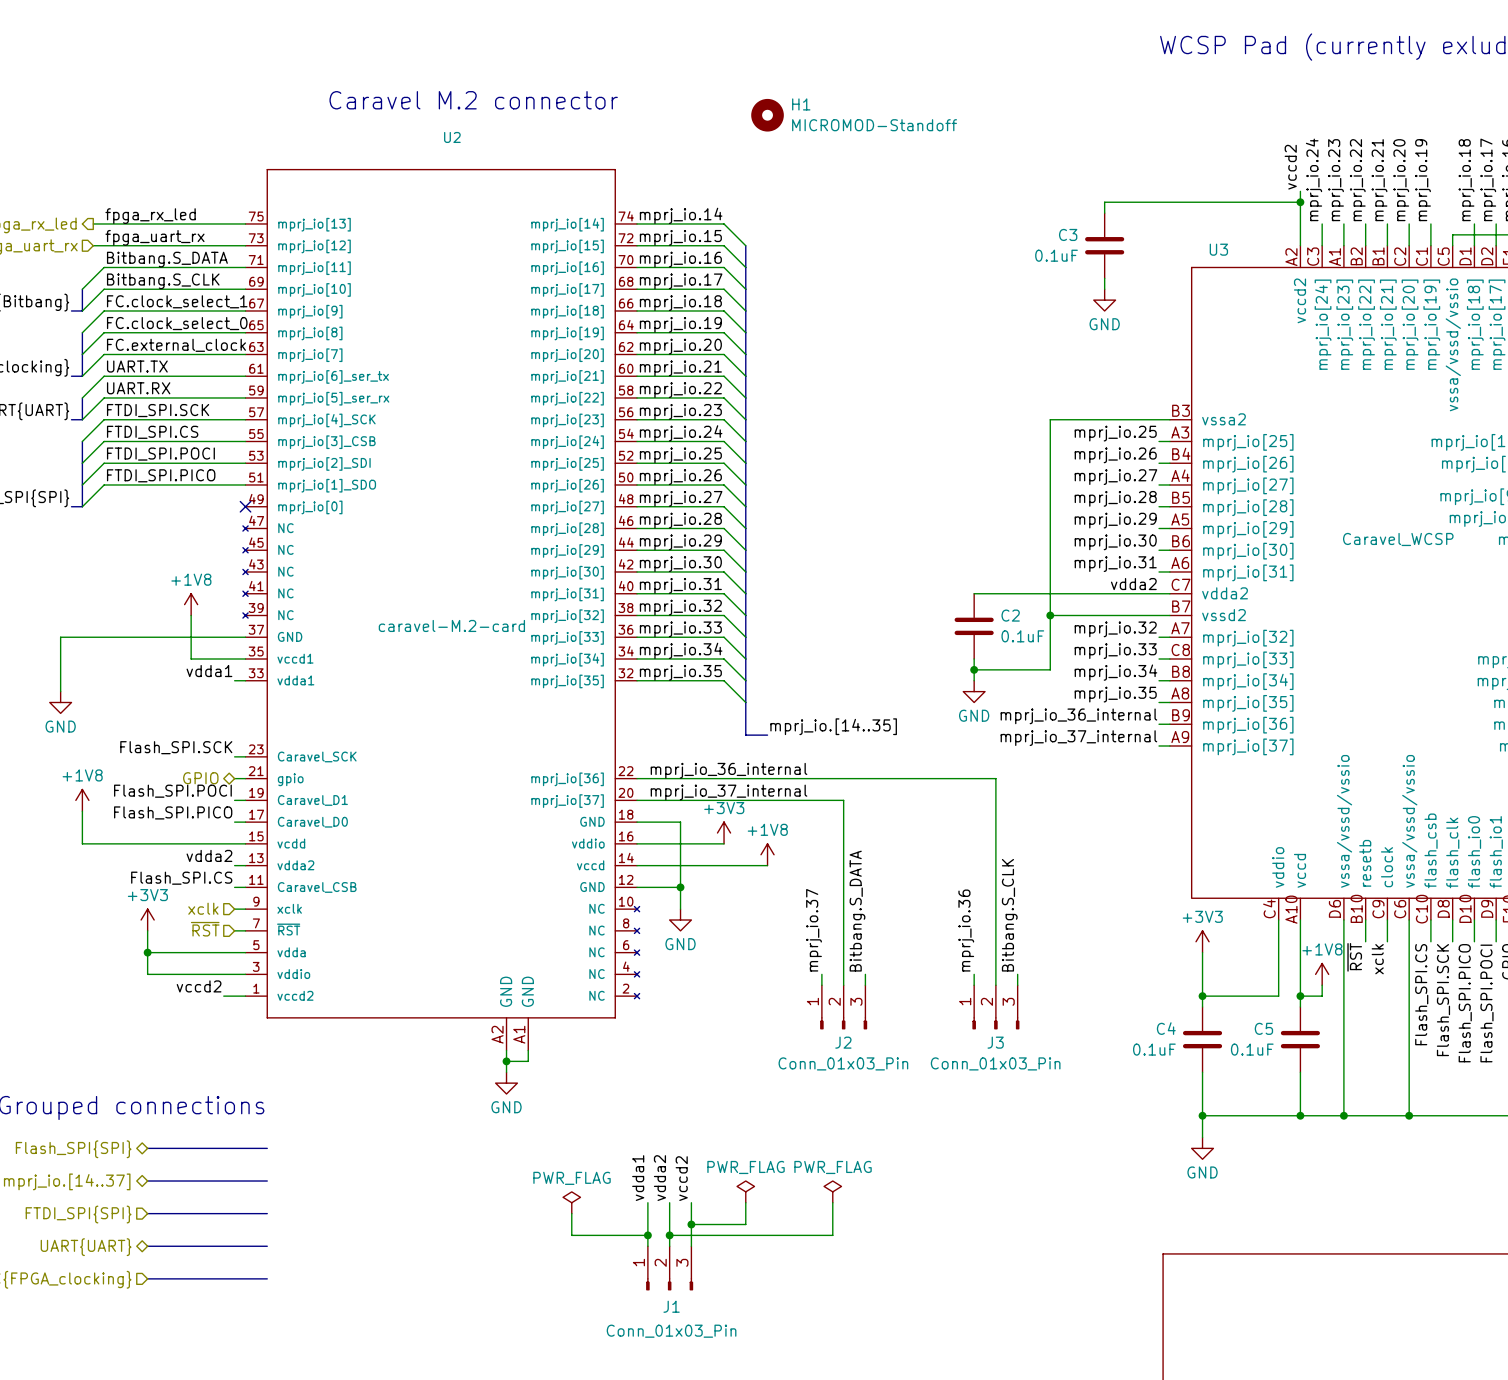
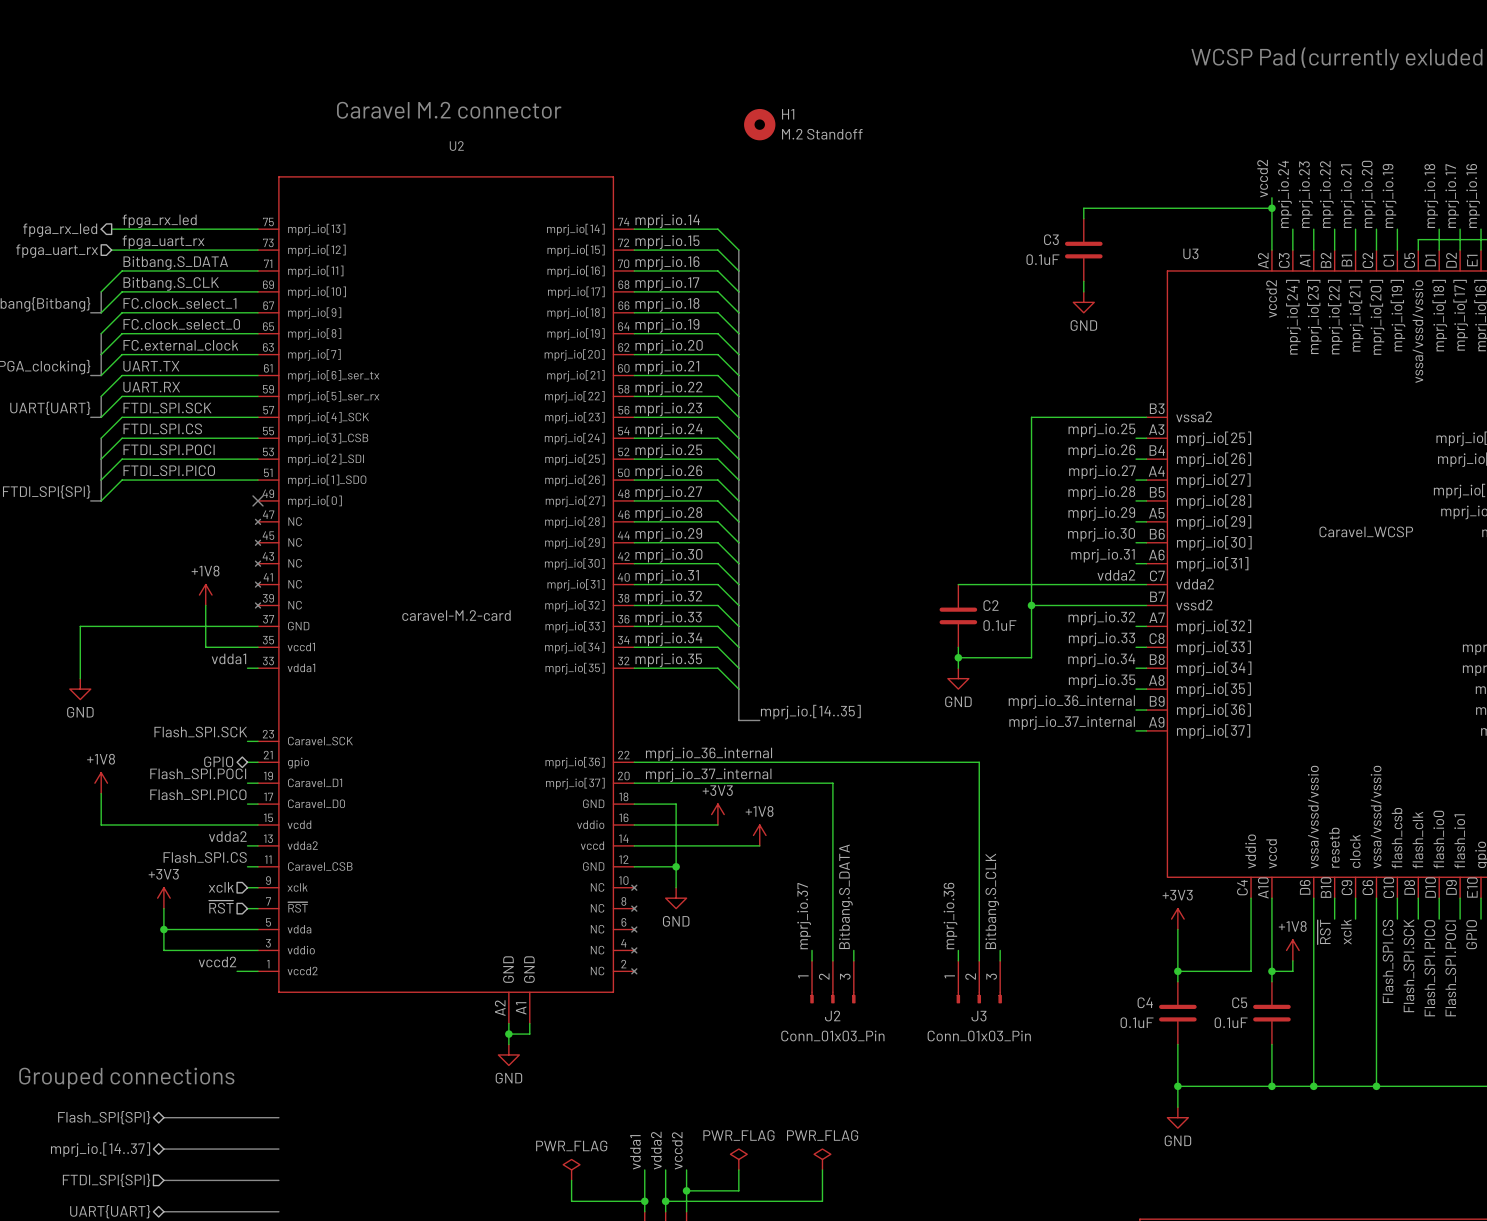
H1 value: MICROMOD-Standoff (874, 125) -> M.2 Standoff (822, 134)

